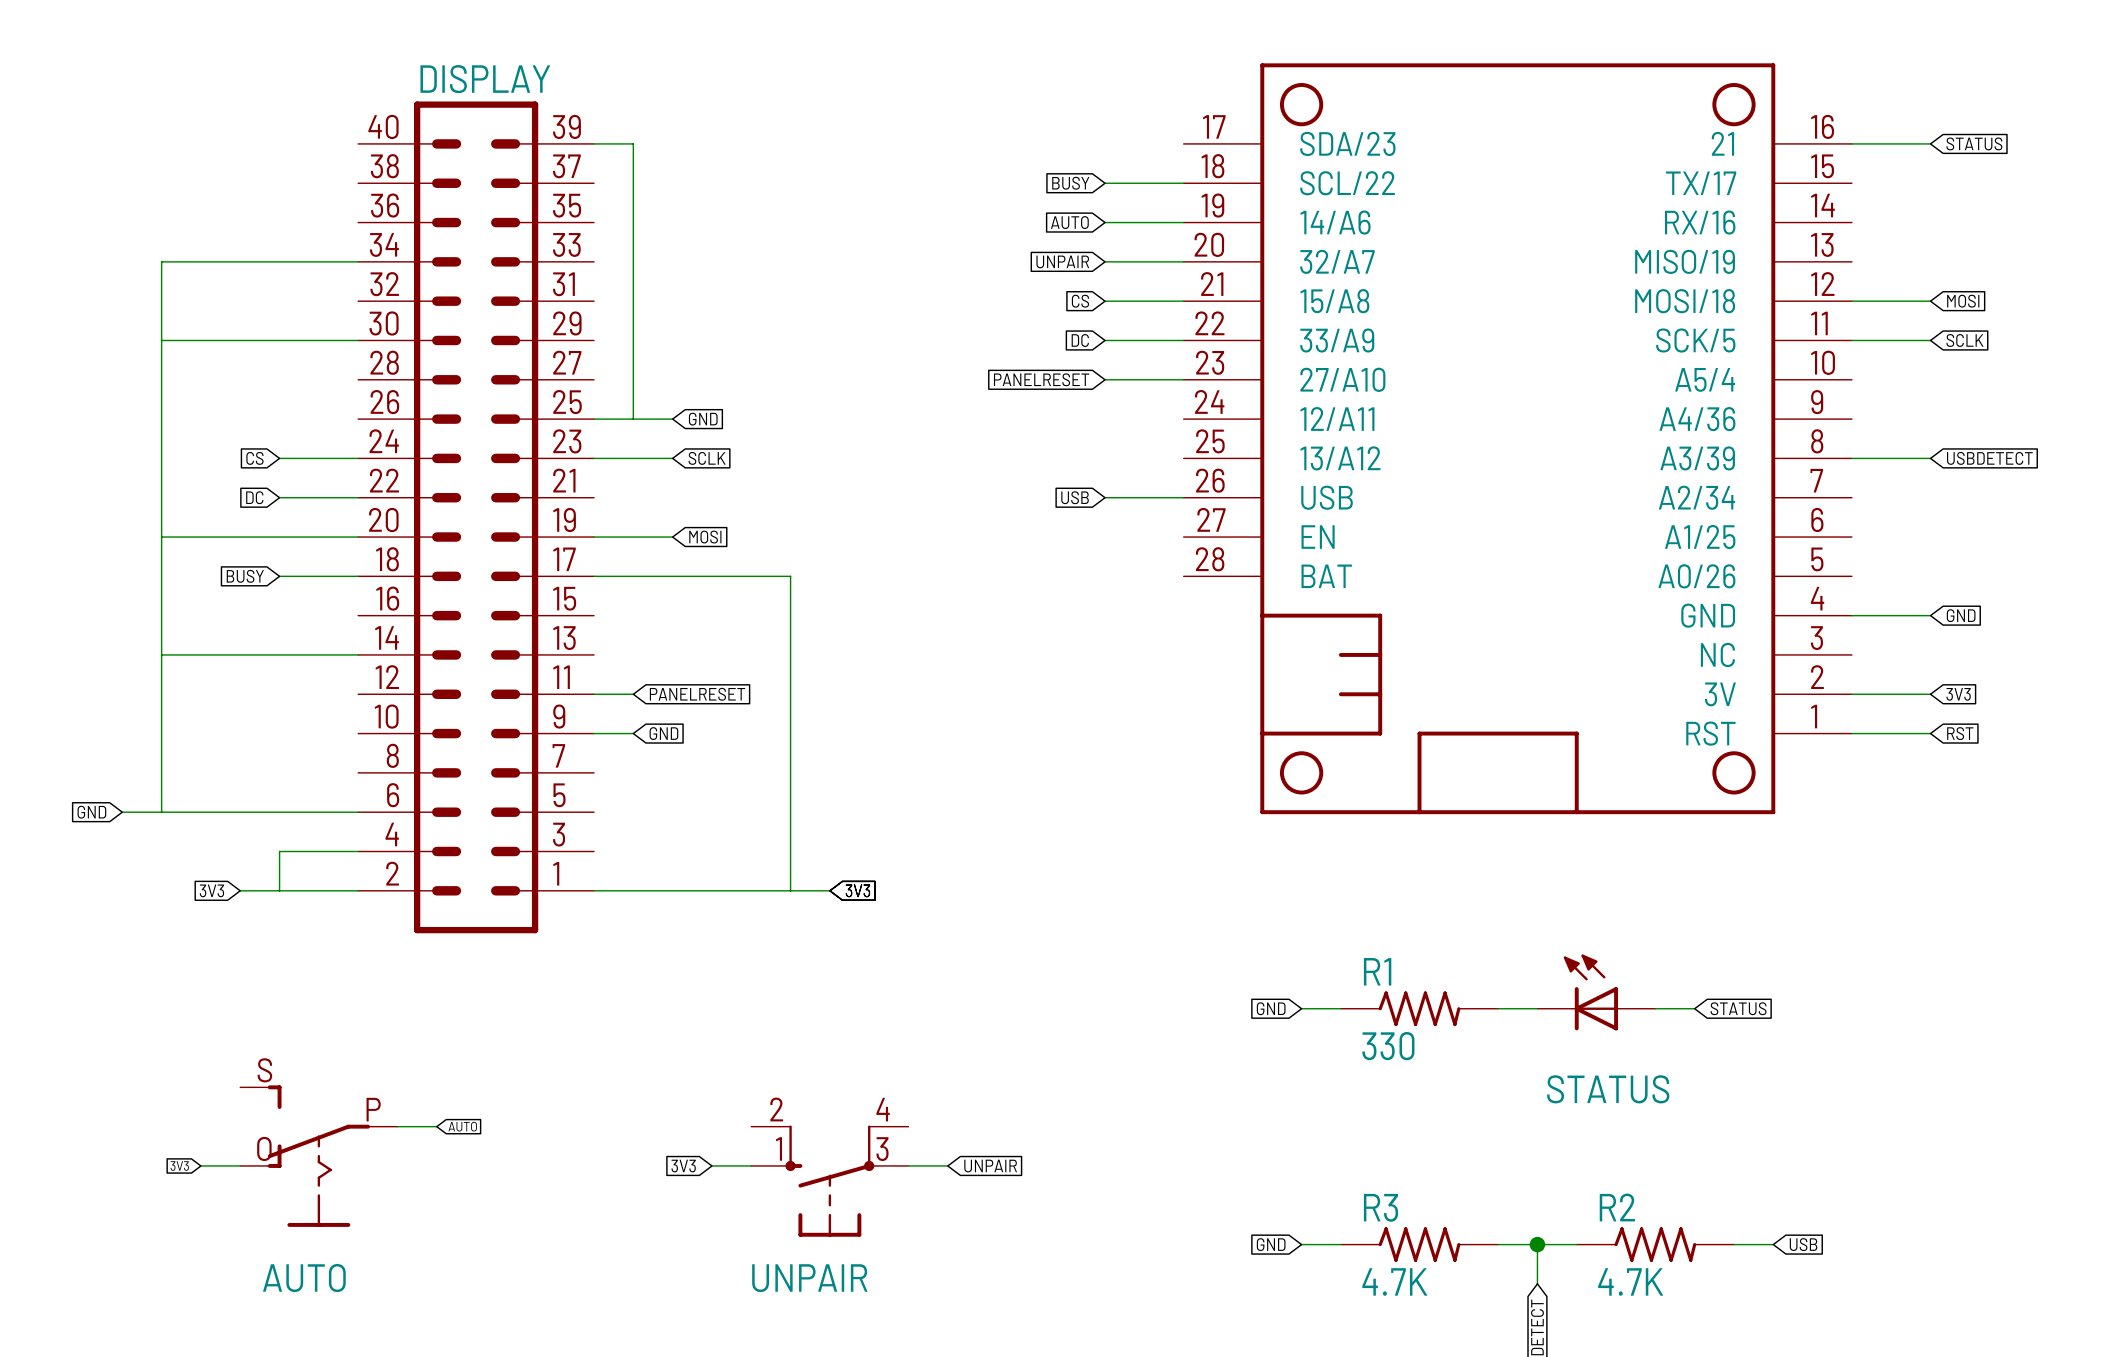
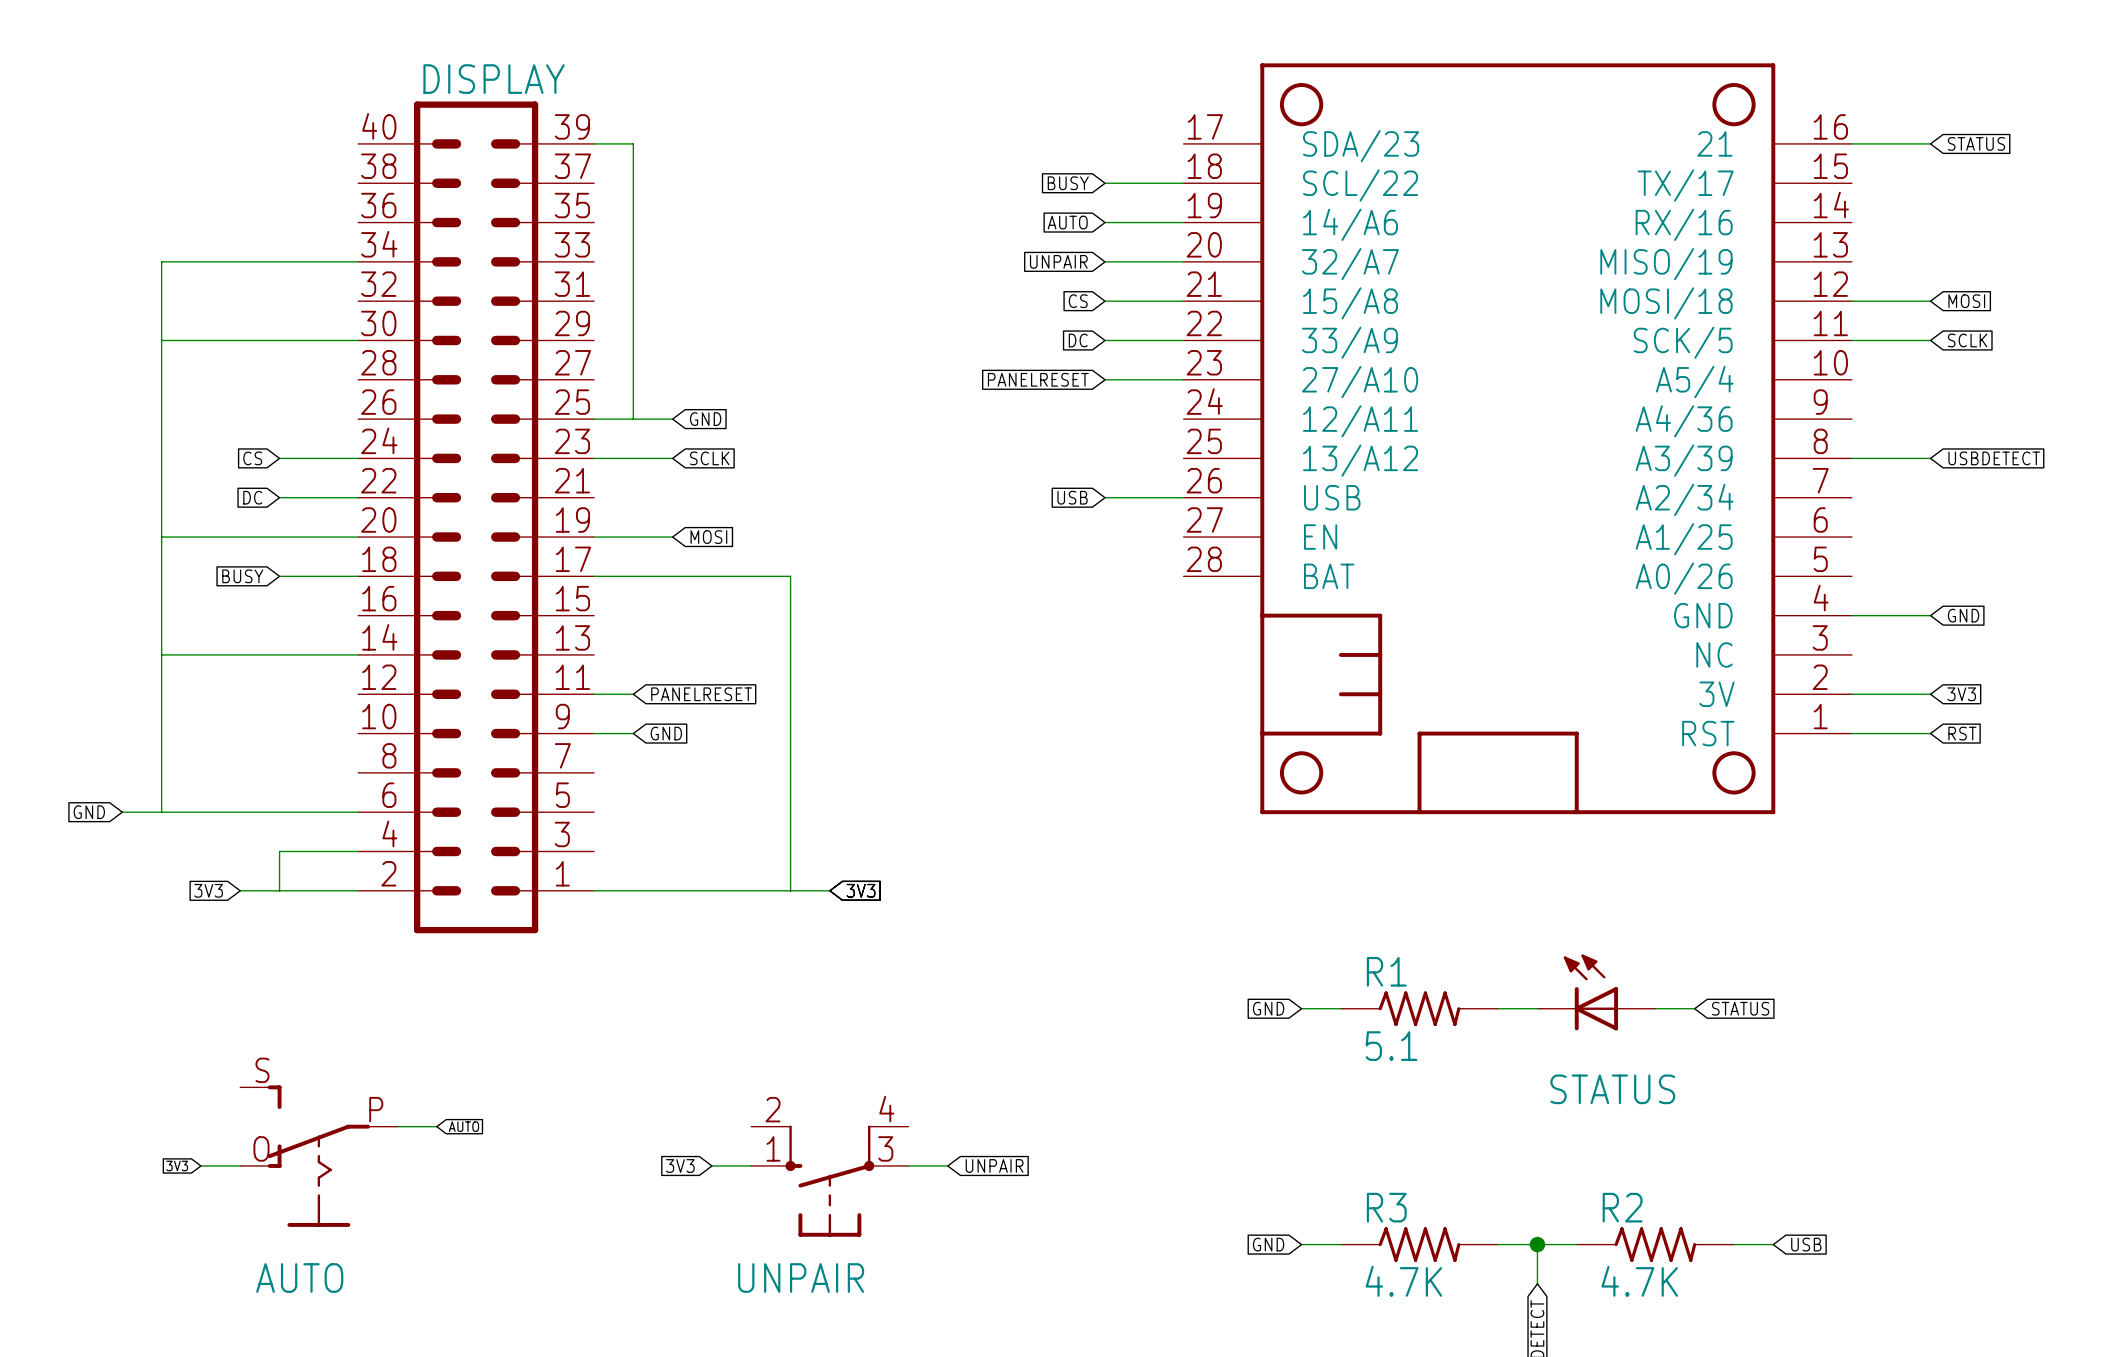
R1 value: 330 (1388, 1046) -> 5.1 (1391, 1046)

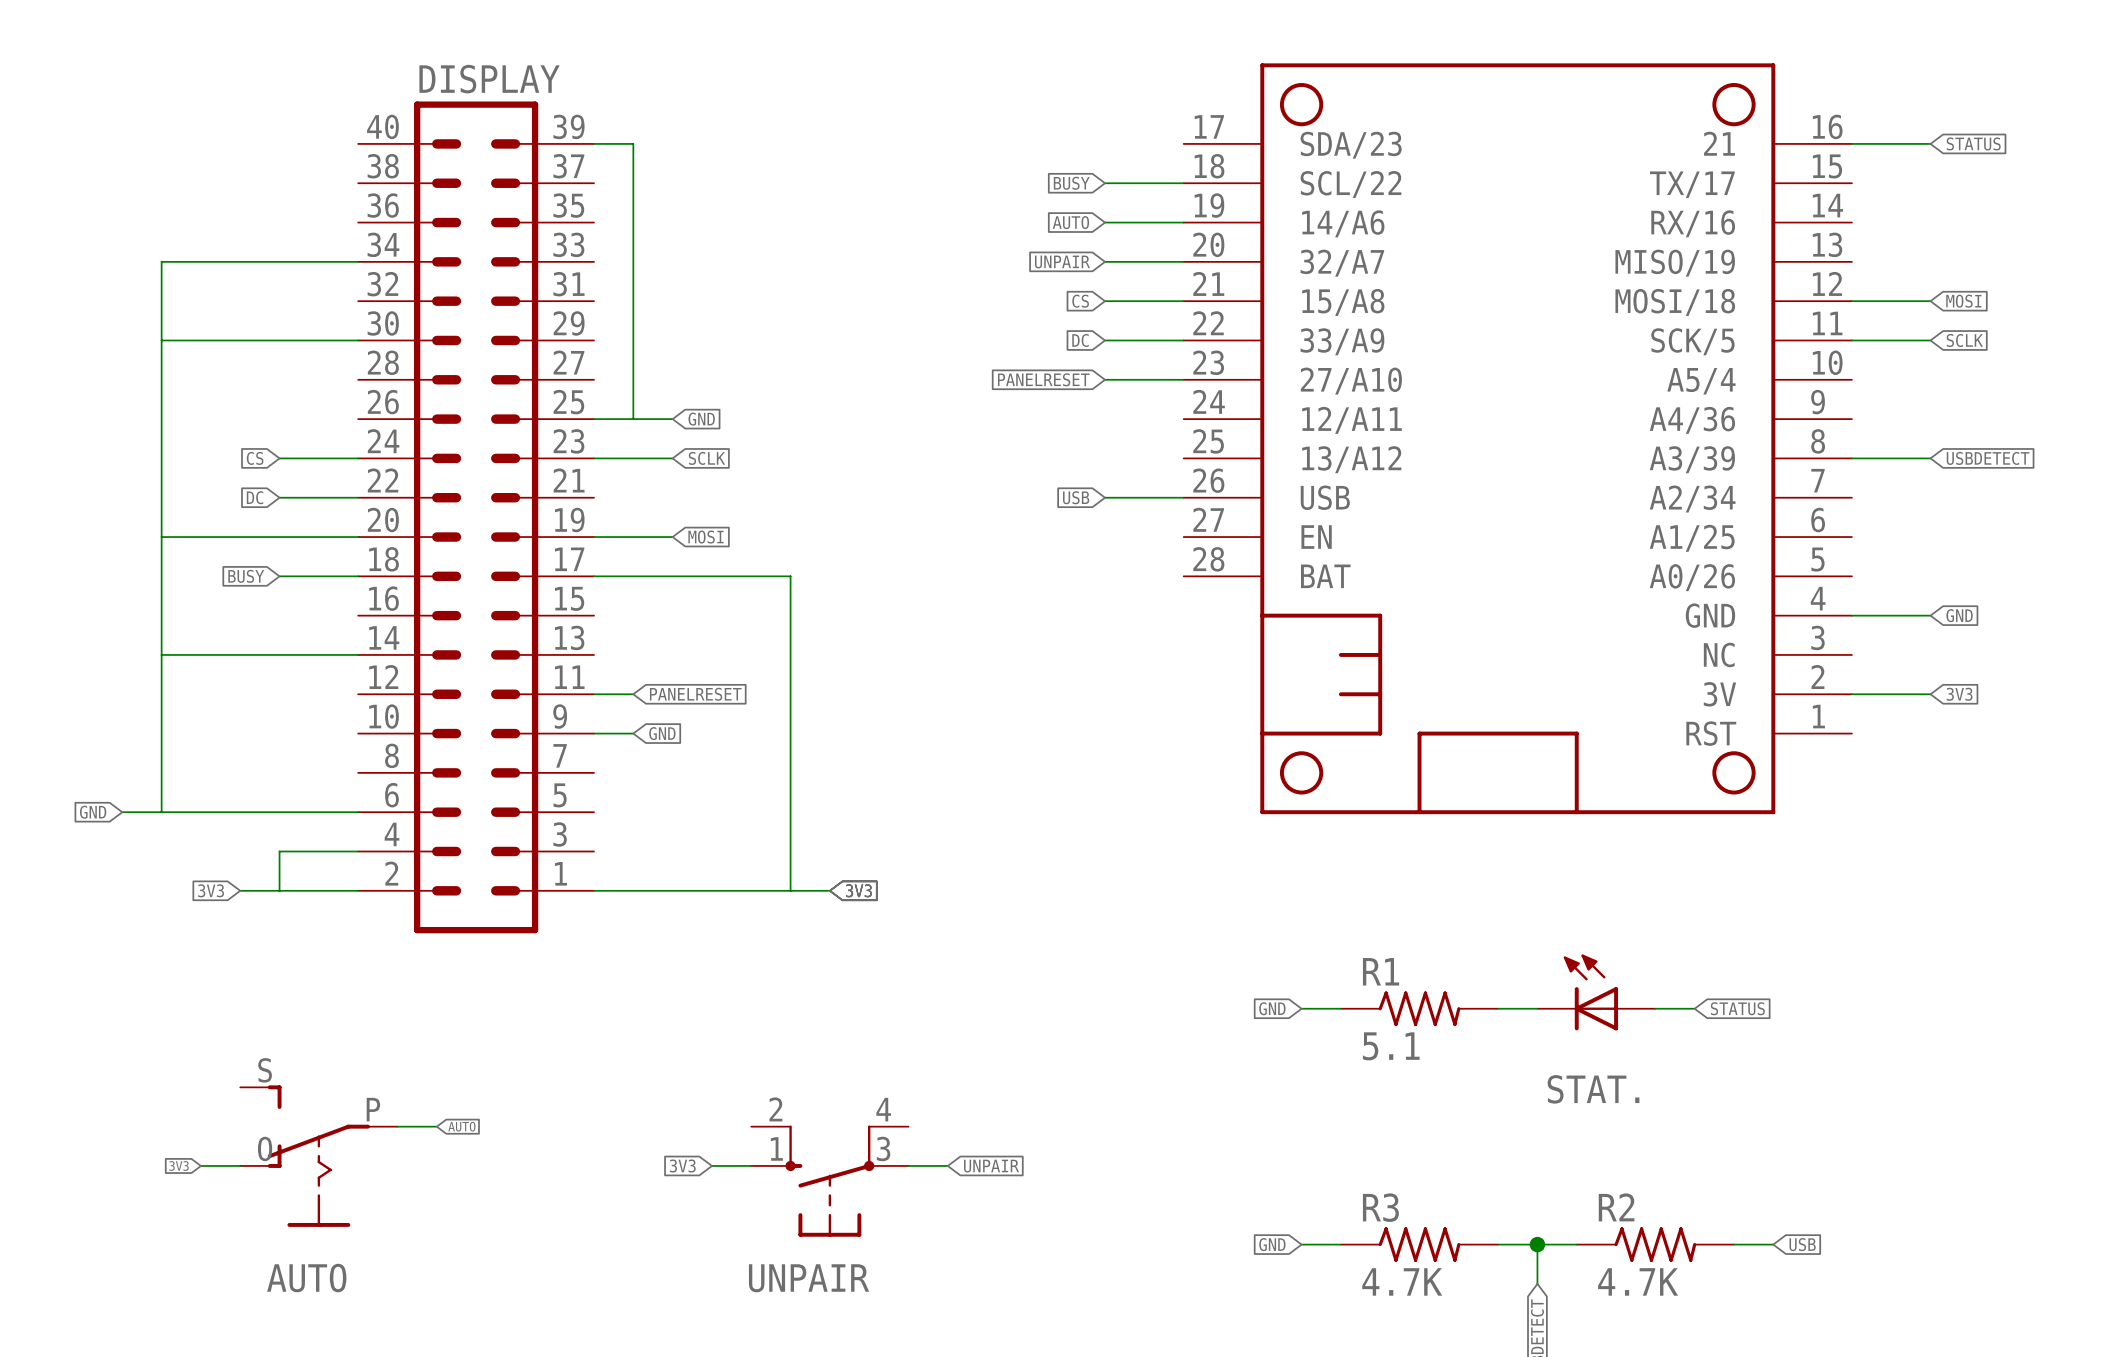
wire: (1851, 733) (1930, 733) -> none
global label: RST (1962, 733) -> none
STATUS name: STATUS (1612, 1089) -> STAT. (1593, 1089)

